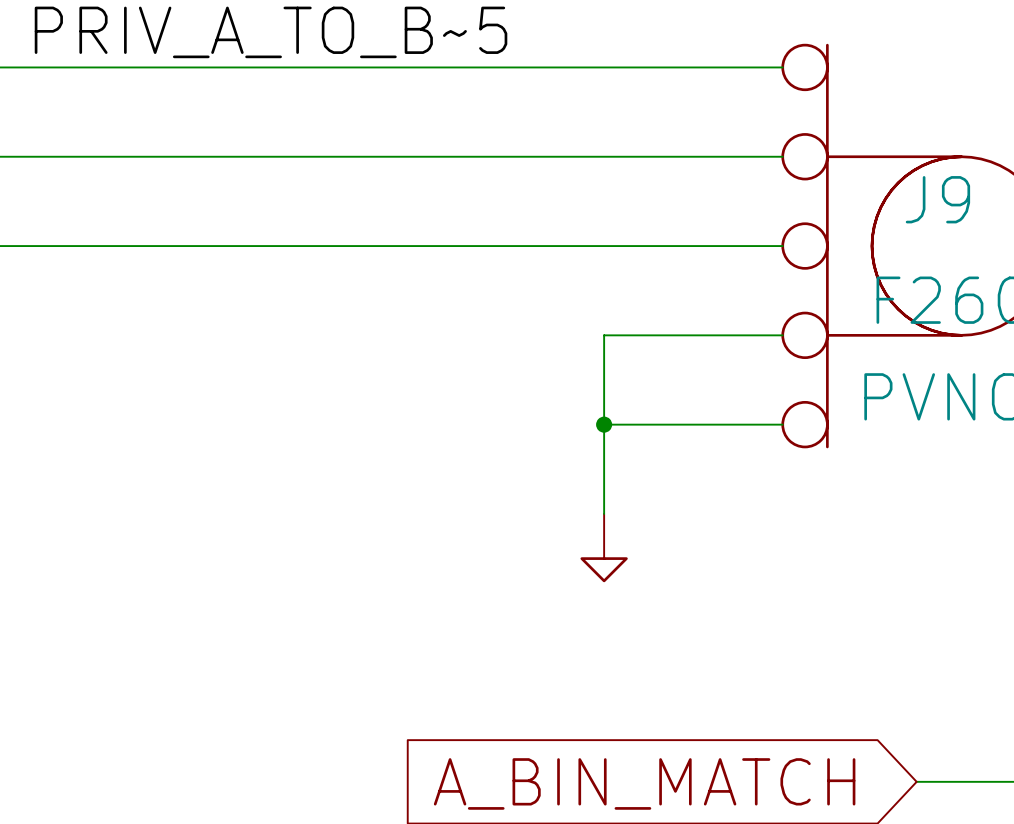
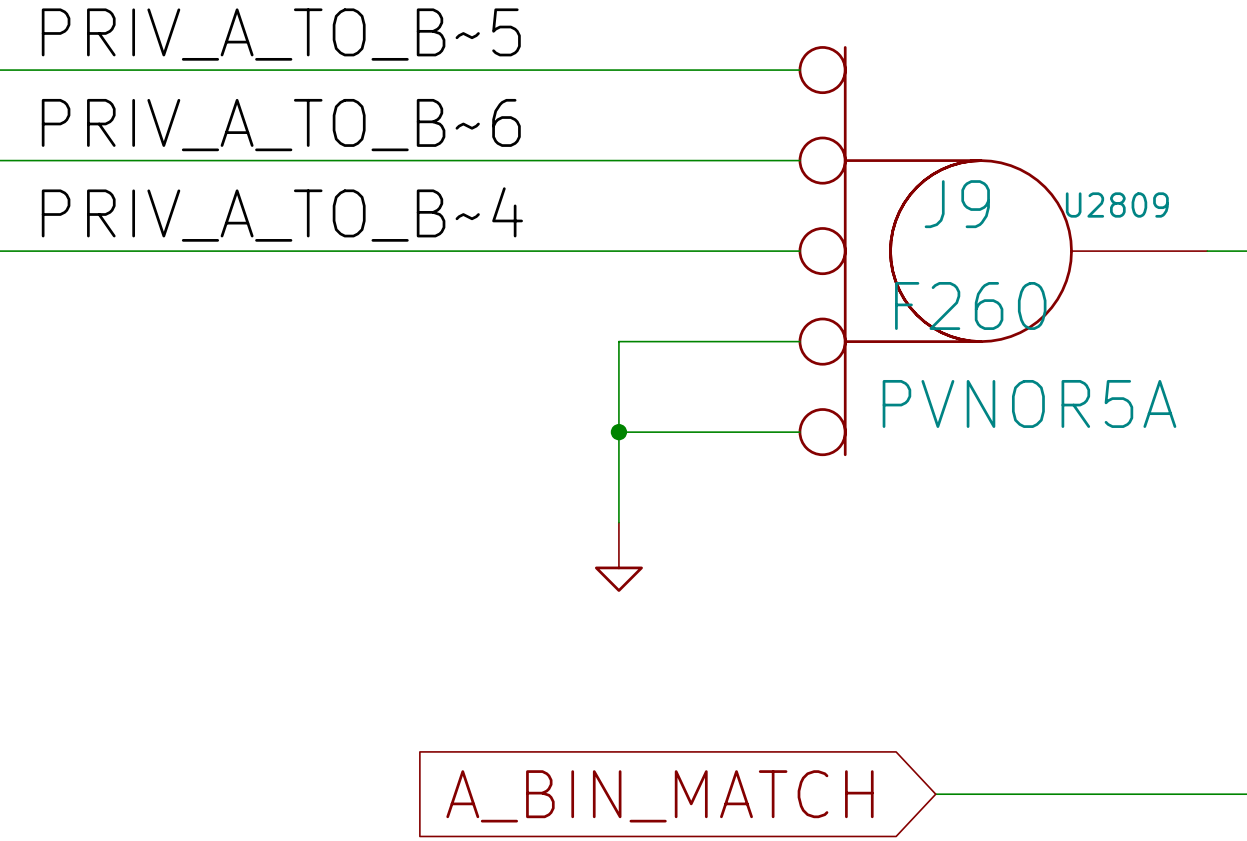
label: none -> PRIV_A_TO_B~6 (281, 125)
label: none -> PRIV_A_TO_B~4 (282, 214)

